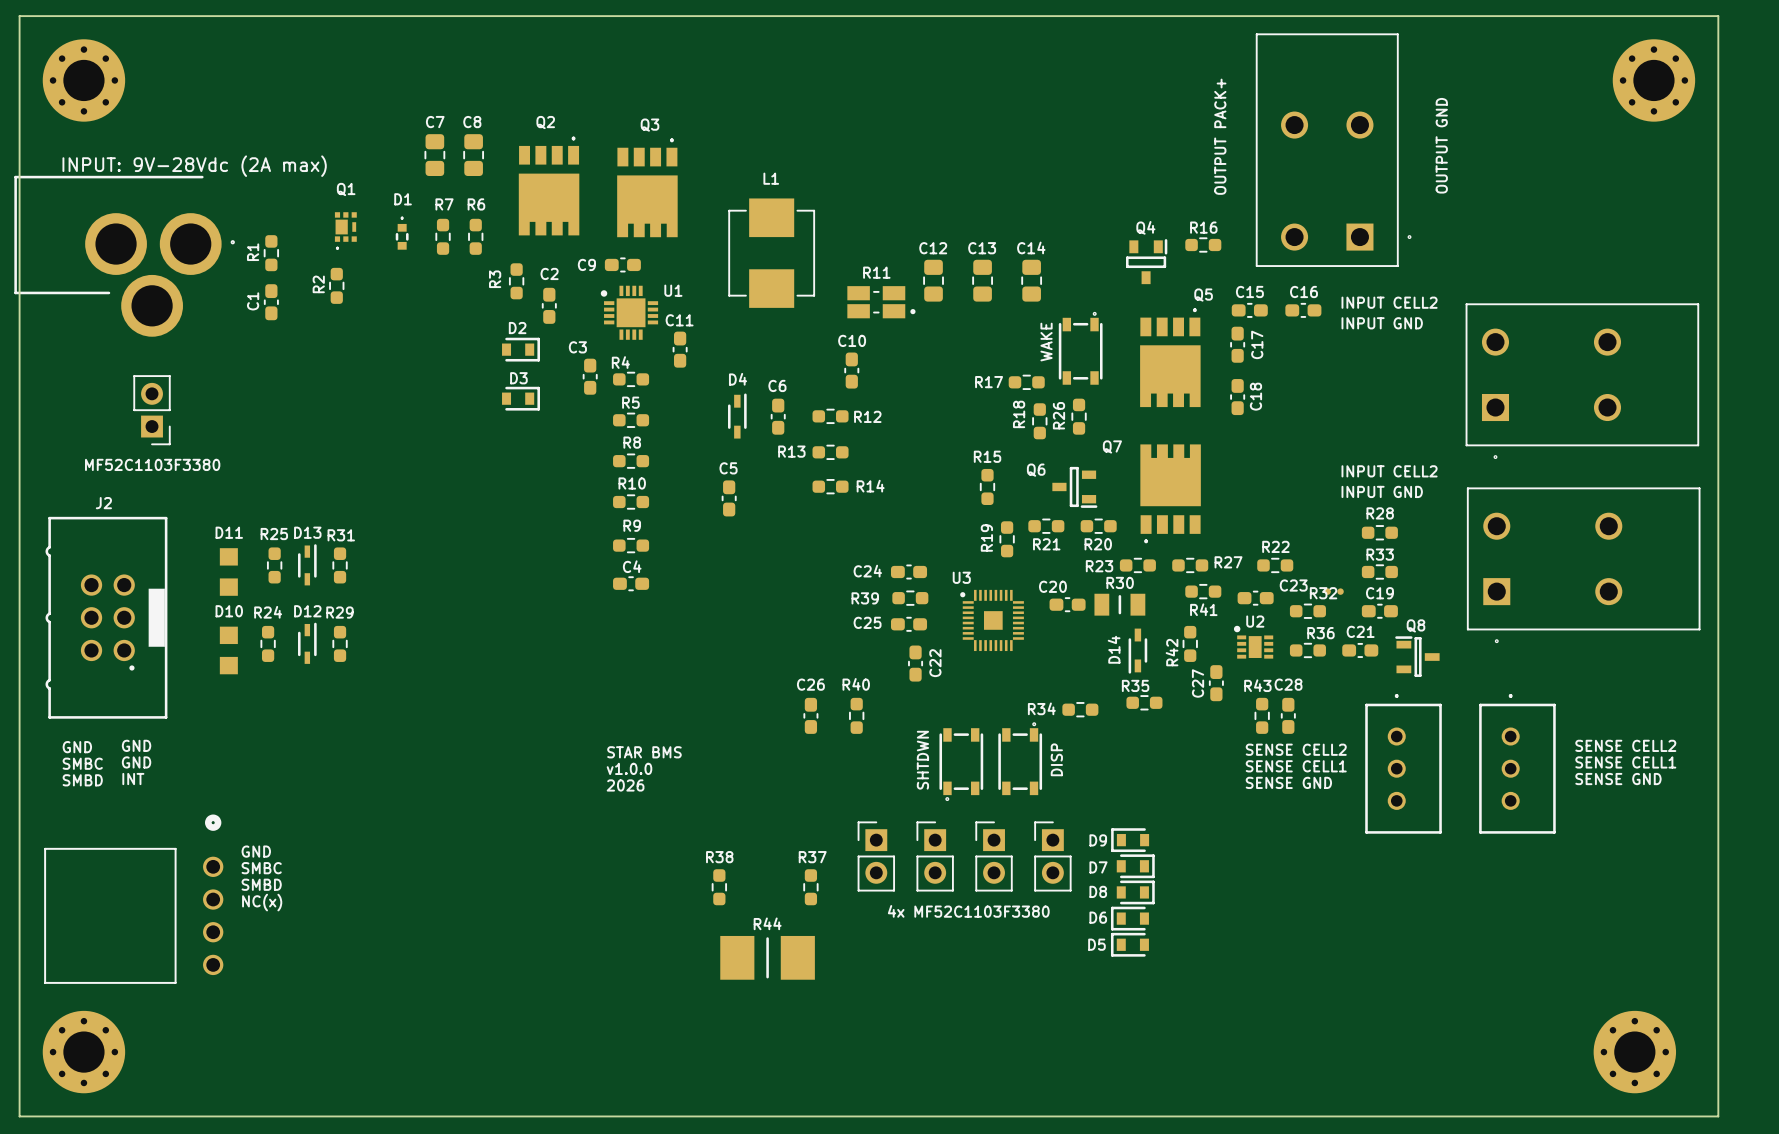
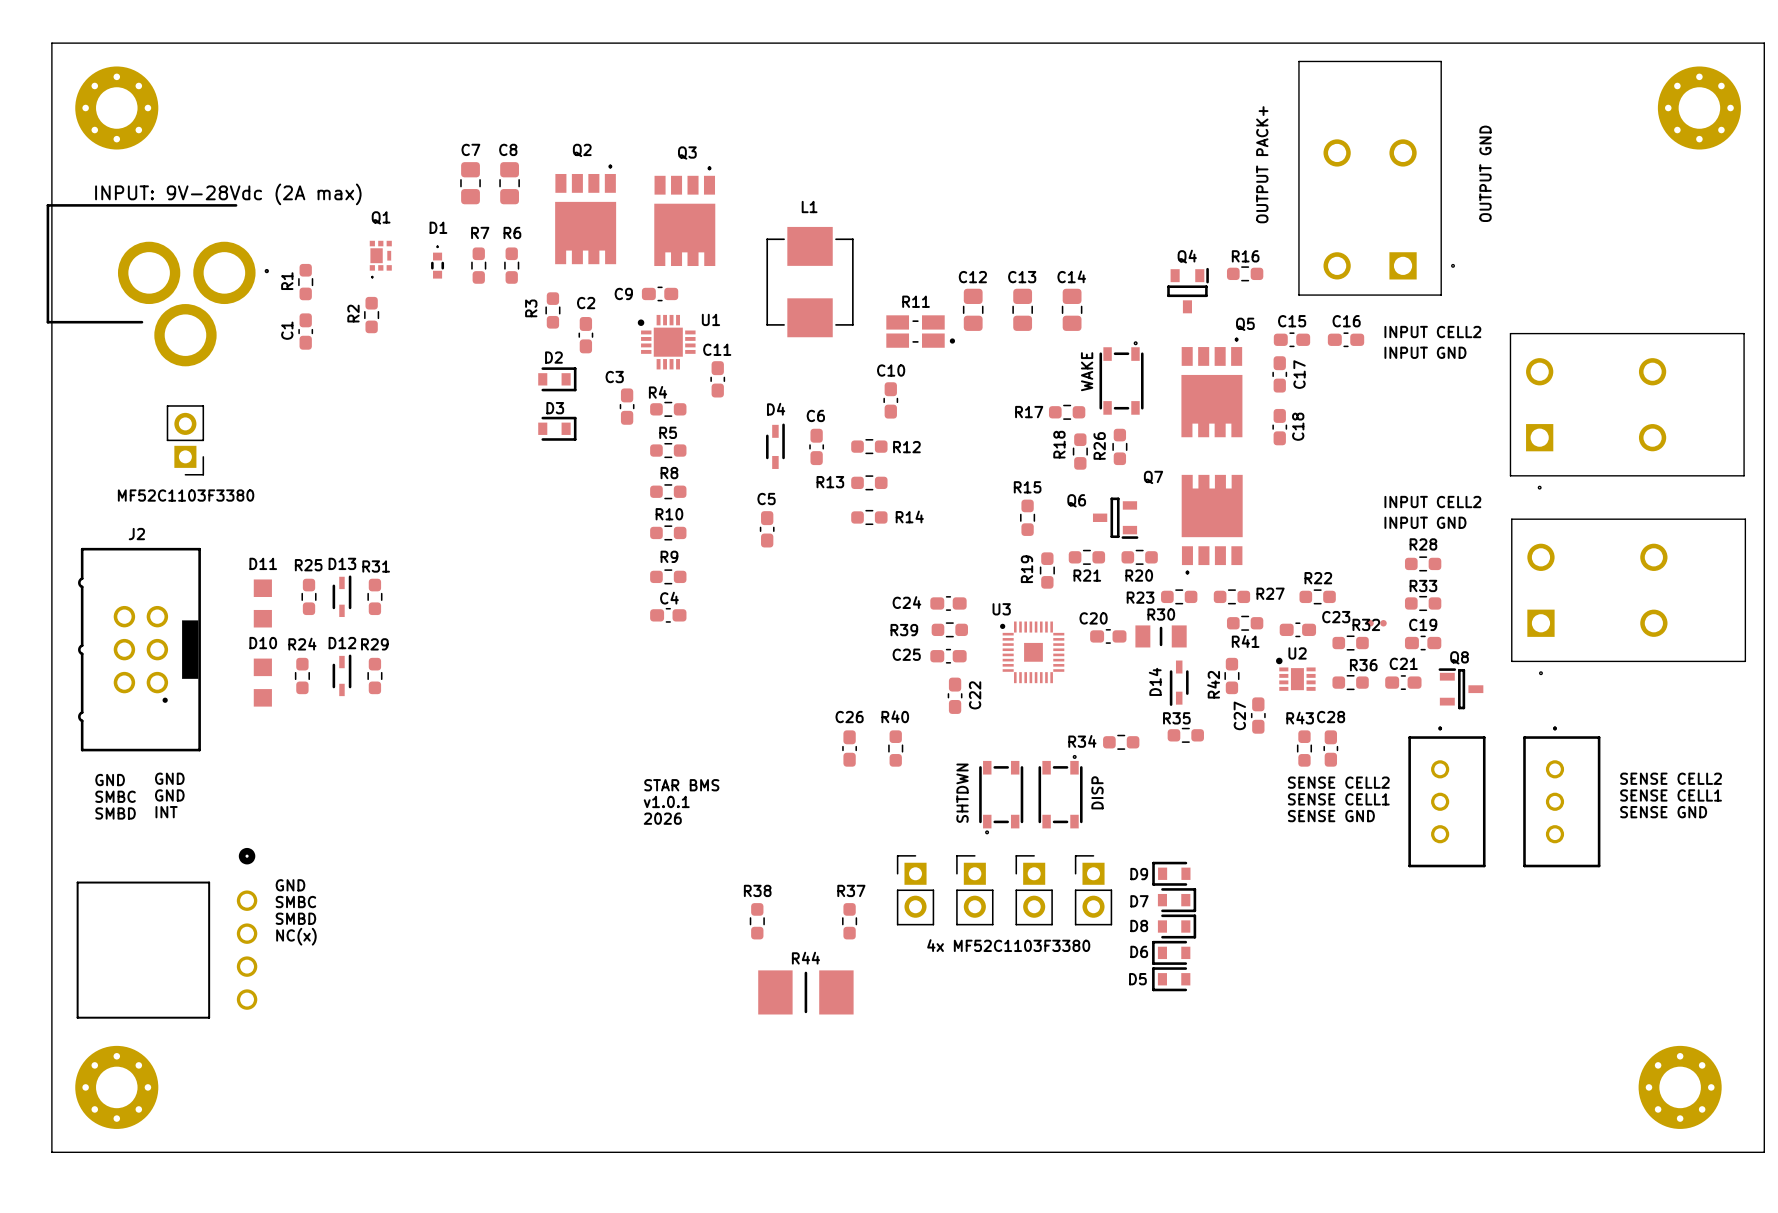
text: v1.0.0 (629, 768) -> v1.0.1 (666, 801)

